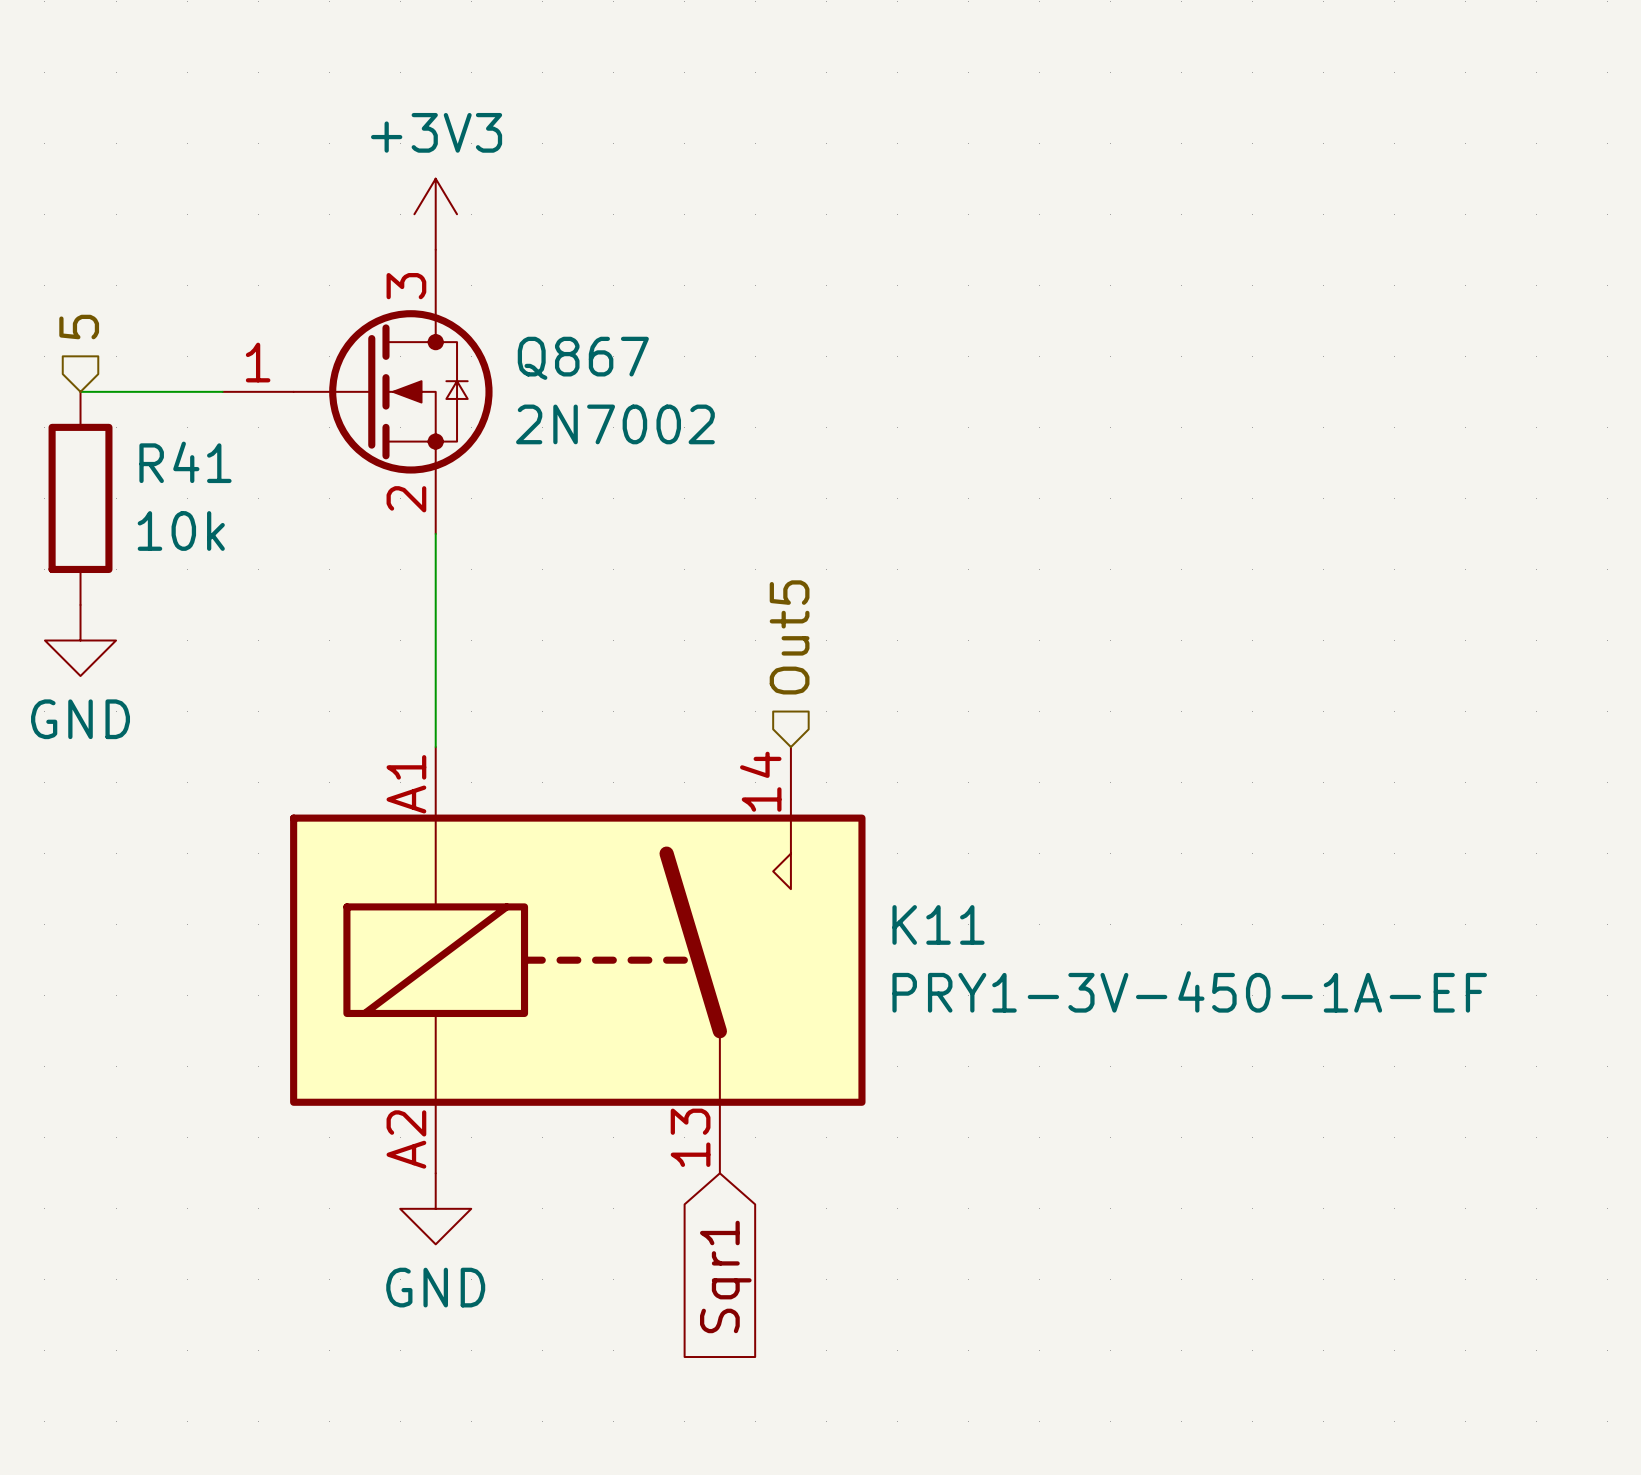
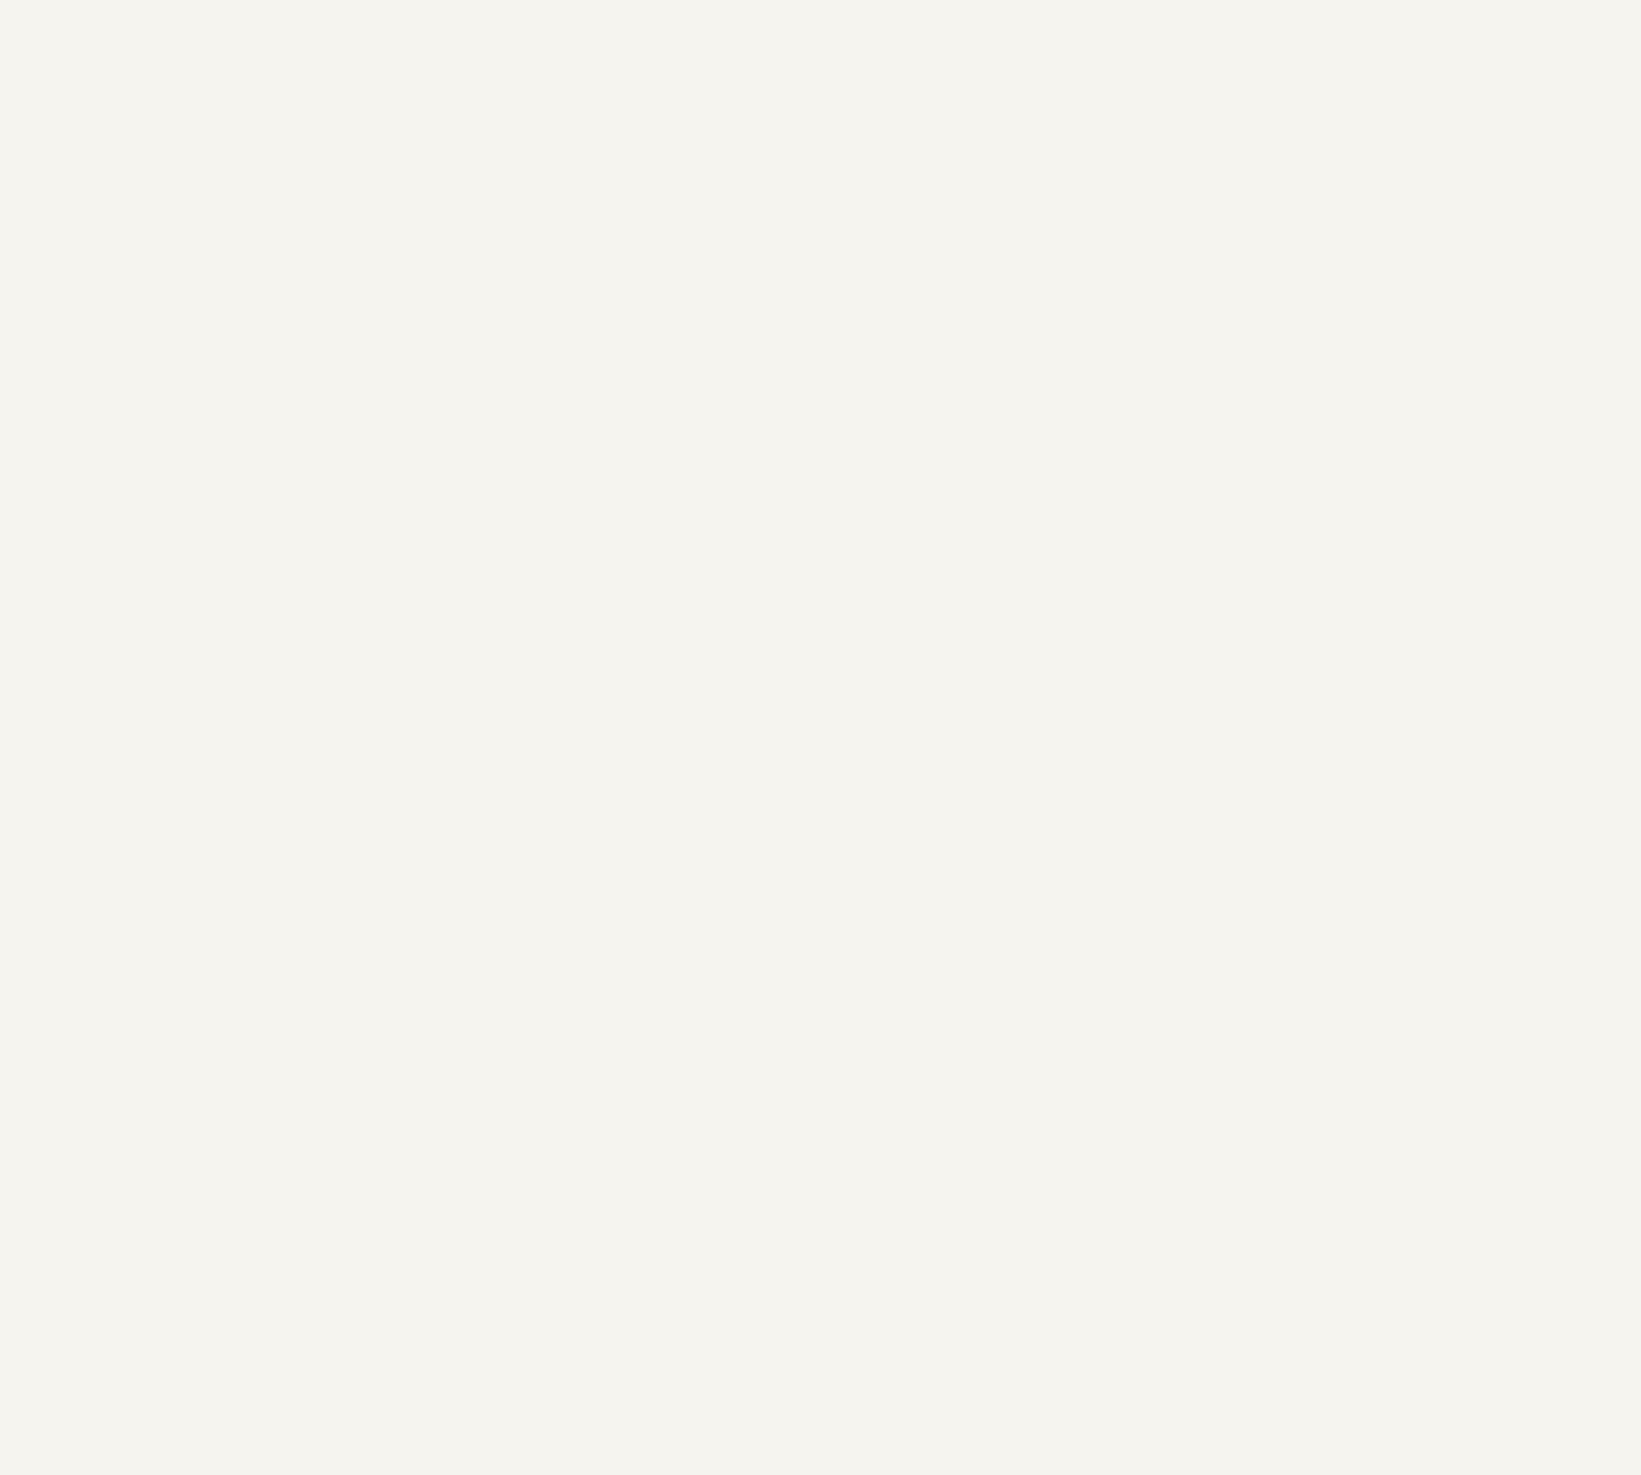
power symbol: +3V3 (435, 214) -> none
hierarchical label: 5 (79, 327) -> none
wire: (80, 391) (222, 391) -> none
Q867: 2N7002 (357, 391) -> none
R41: 10k (80, 498) -> none
wire: (435, 533) (435, 747) -> none
hierarchical label: Out5 (789, 637) -> none
power symbol: GND (80, 640) -> none
K11: PRY1-3V-450-1A-EF (577, 960) -> none
power symbol: GND (435, 1208) -> none
global label: Sqr1 (725, 1276) -> none

